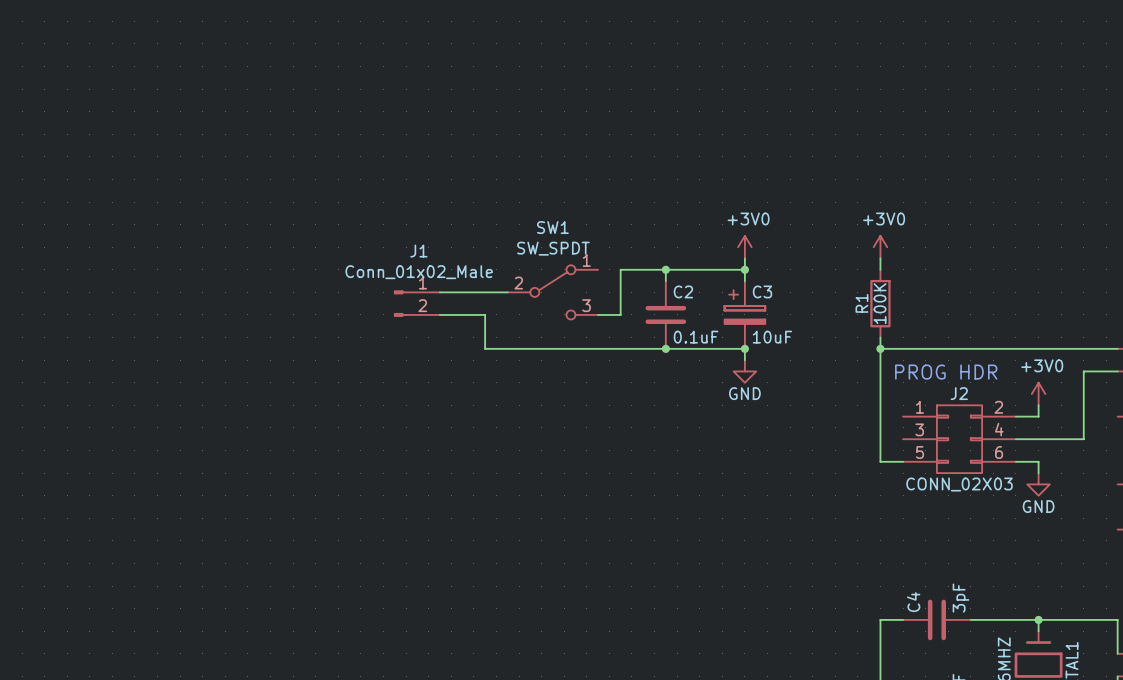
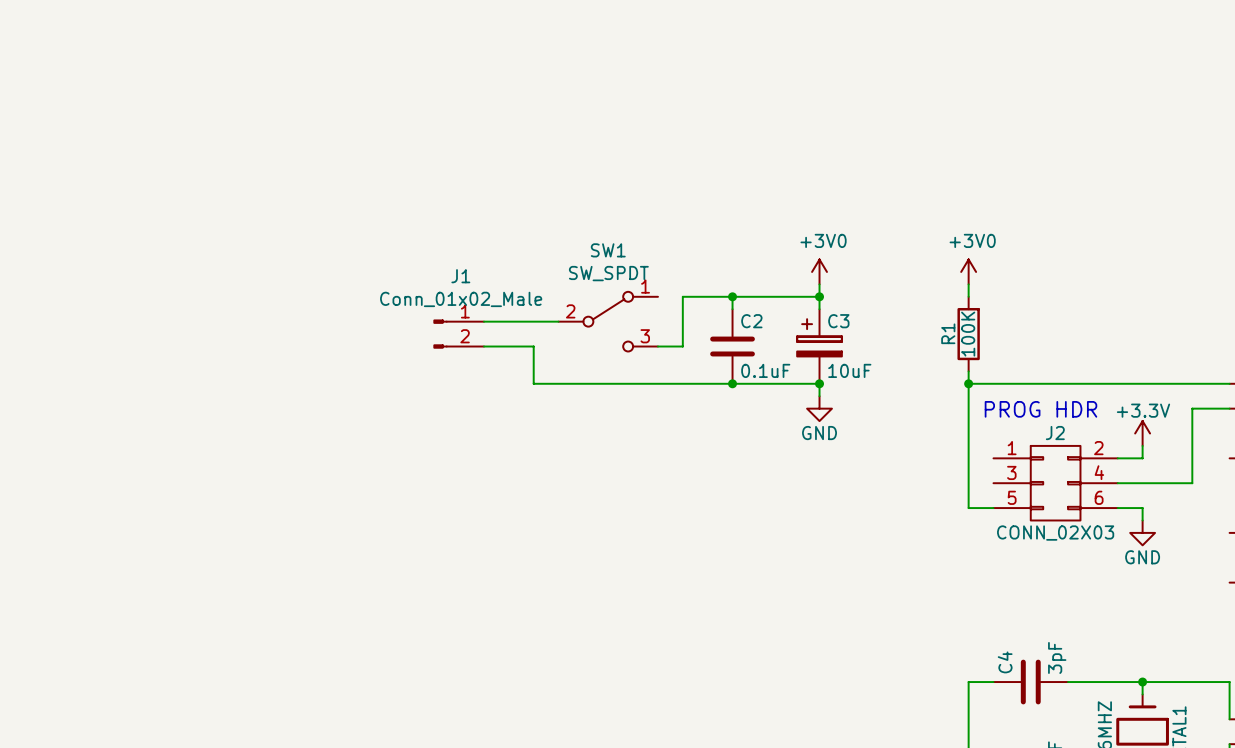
power symbol: +3V0 (1038, 394) -> +3.3V (1142, 433)

